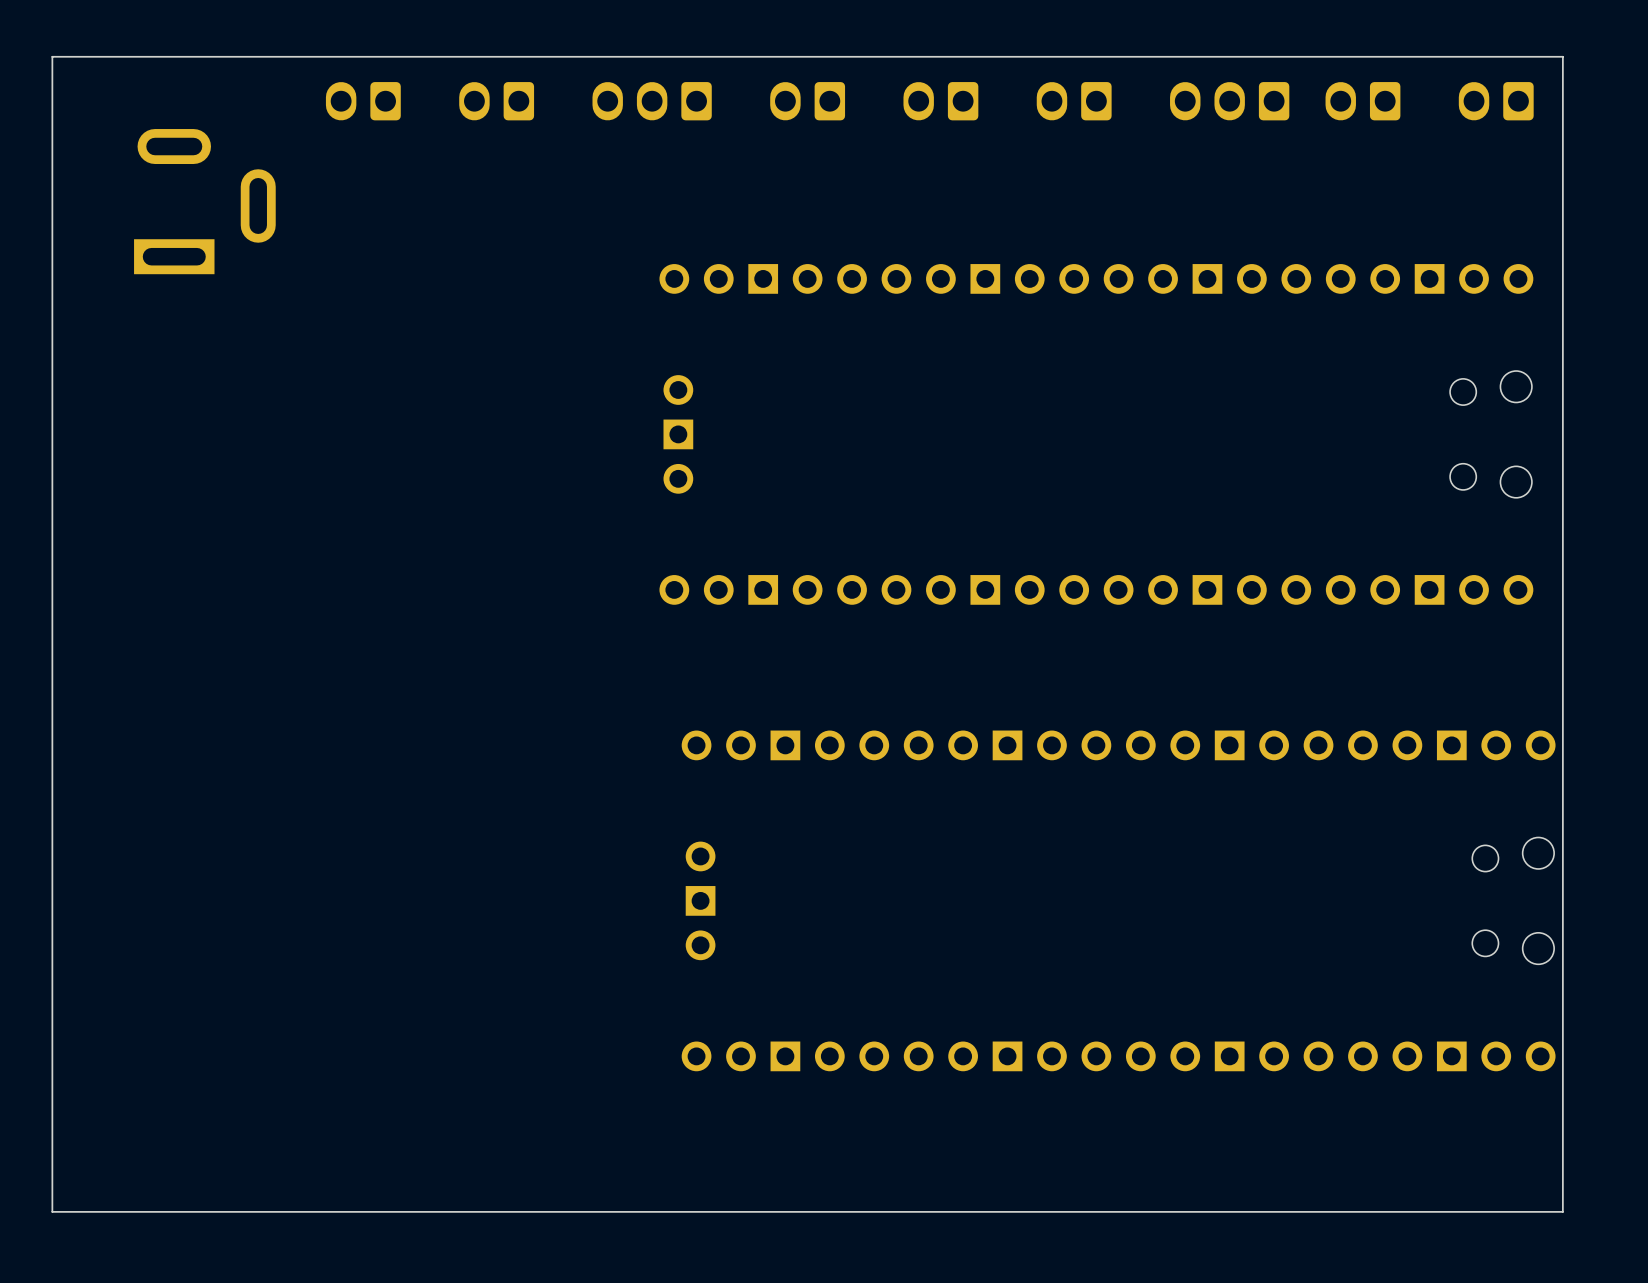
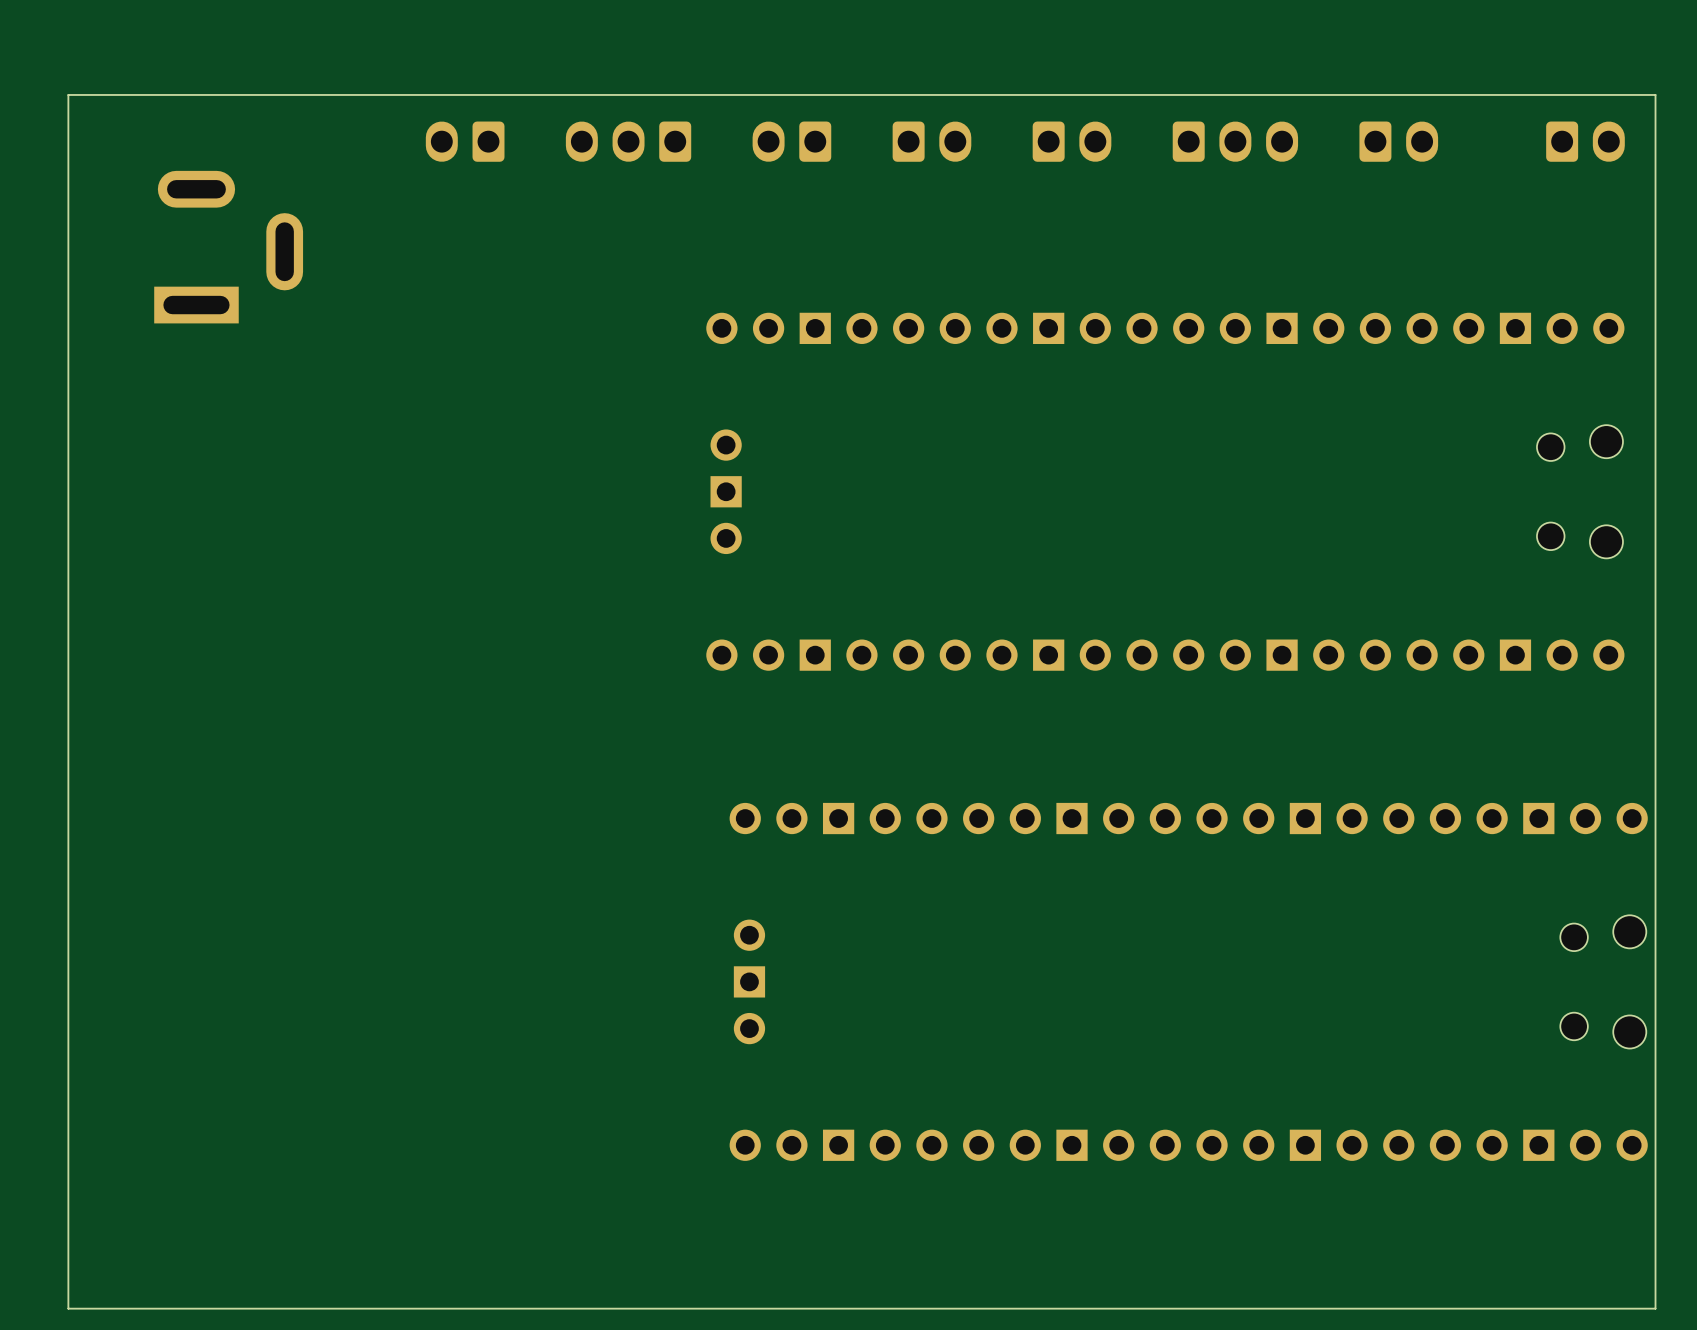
part: (363, 101) -> none
part: none -> (465, 141)
part: (496, 101) -> none
part position: (652, 101) -> (628, 141)
part: none -> (791, 141)
part: (807, 101) -> none
part: none -> (931, 141)
part: (940, 101) -> none
part: none -> (1072, 141)
part: (1074, 101) -> none
part rotation: 0° (1229, 101) -> 180° (1235, 141)
part rotation: 0° (1362, 101) -> 180° (1398, 141)
part rotation: 0° (1496, 101) -> 180° (1585, 141)

